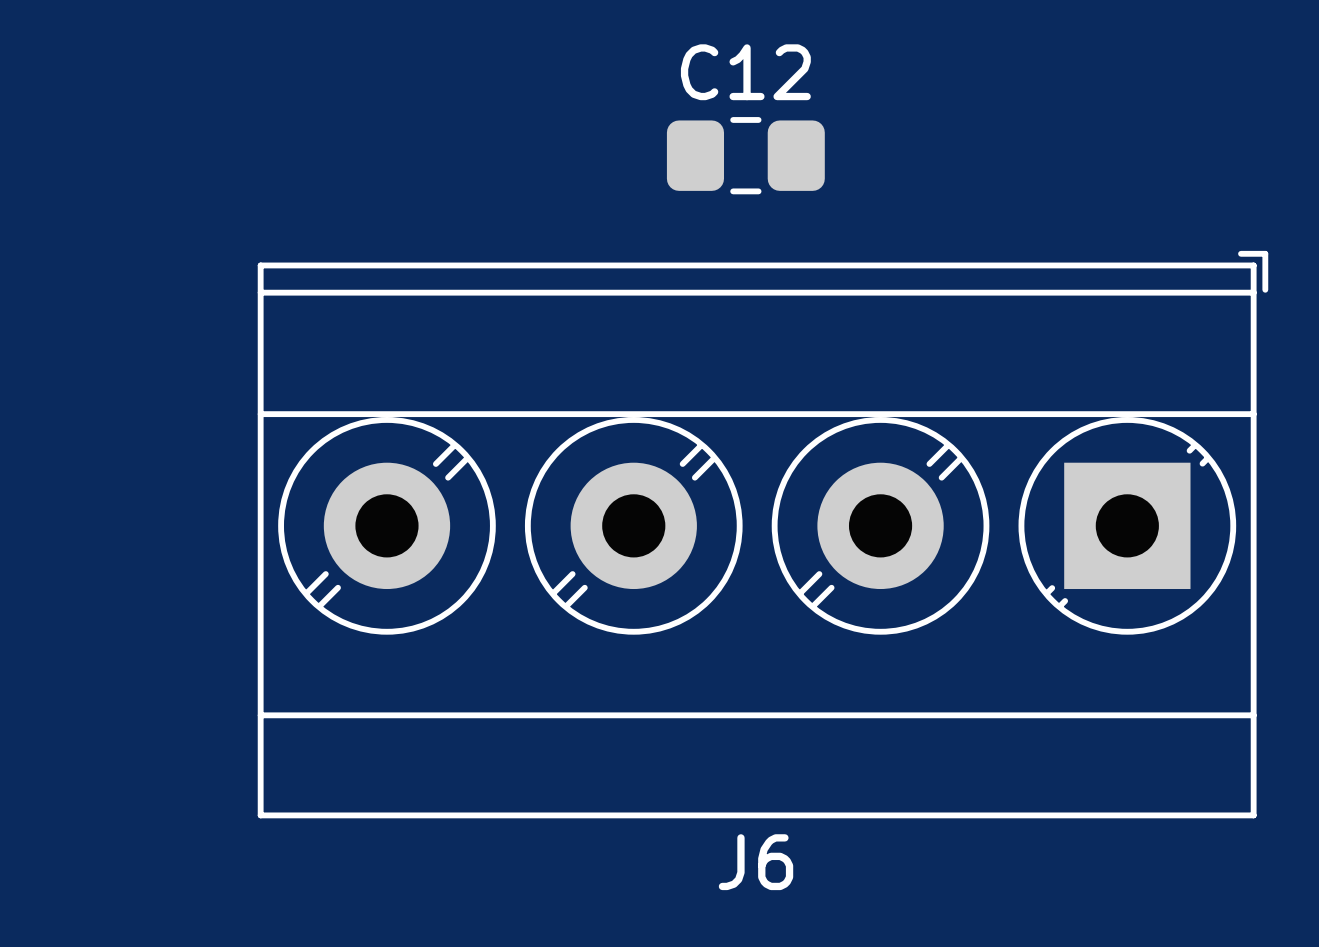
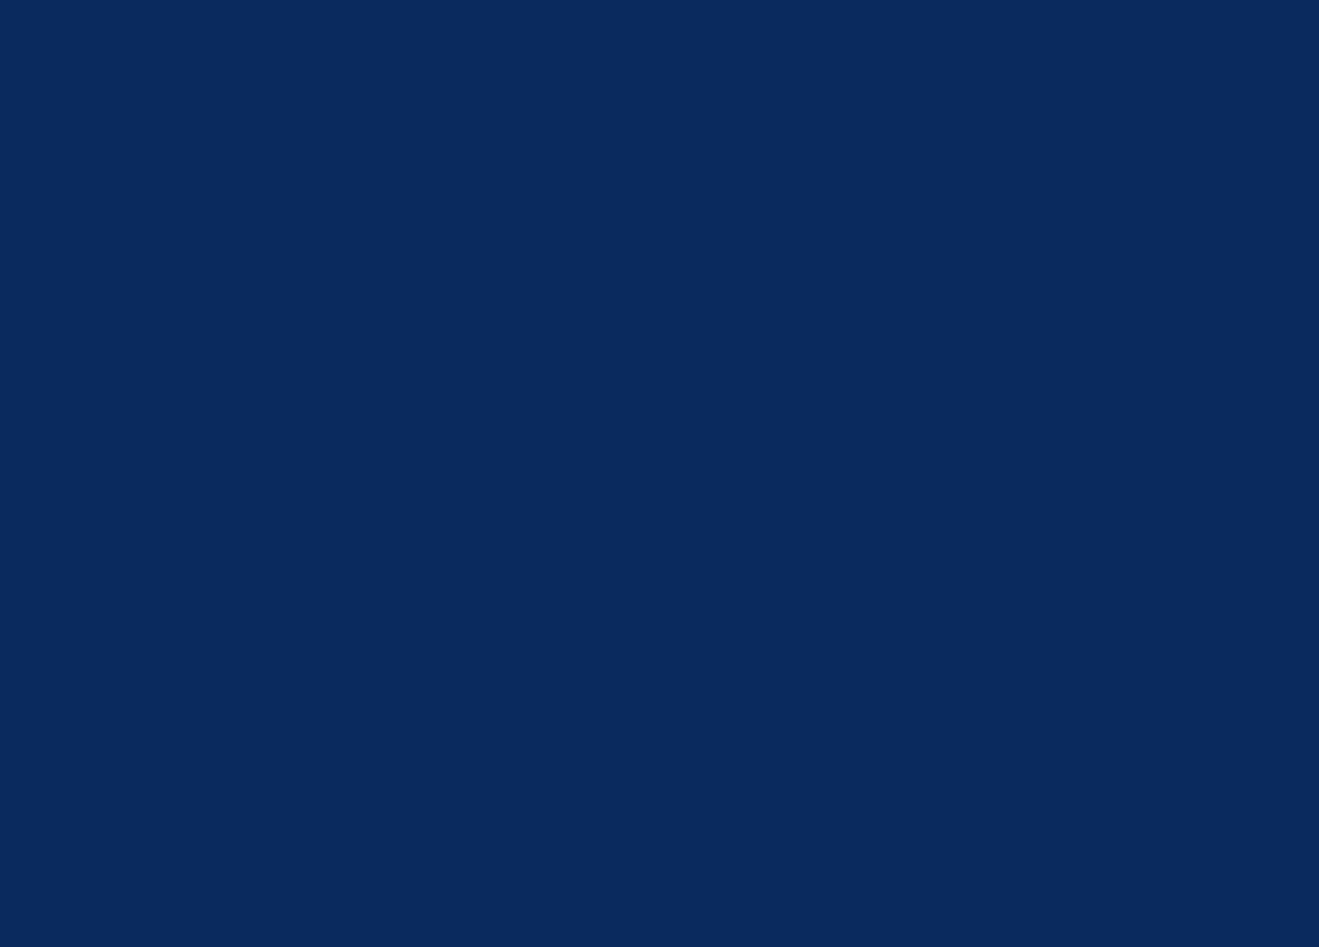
C12: (745, 155) -> none
J6: (762, 534) -> none

